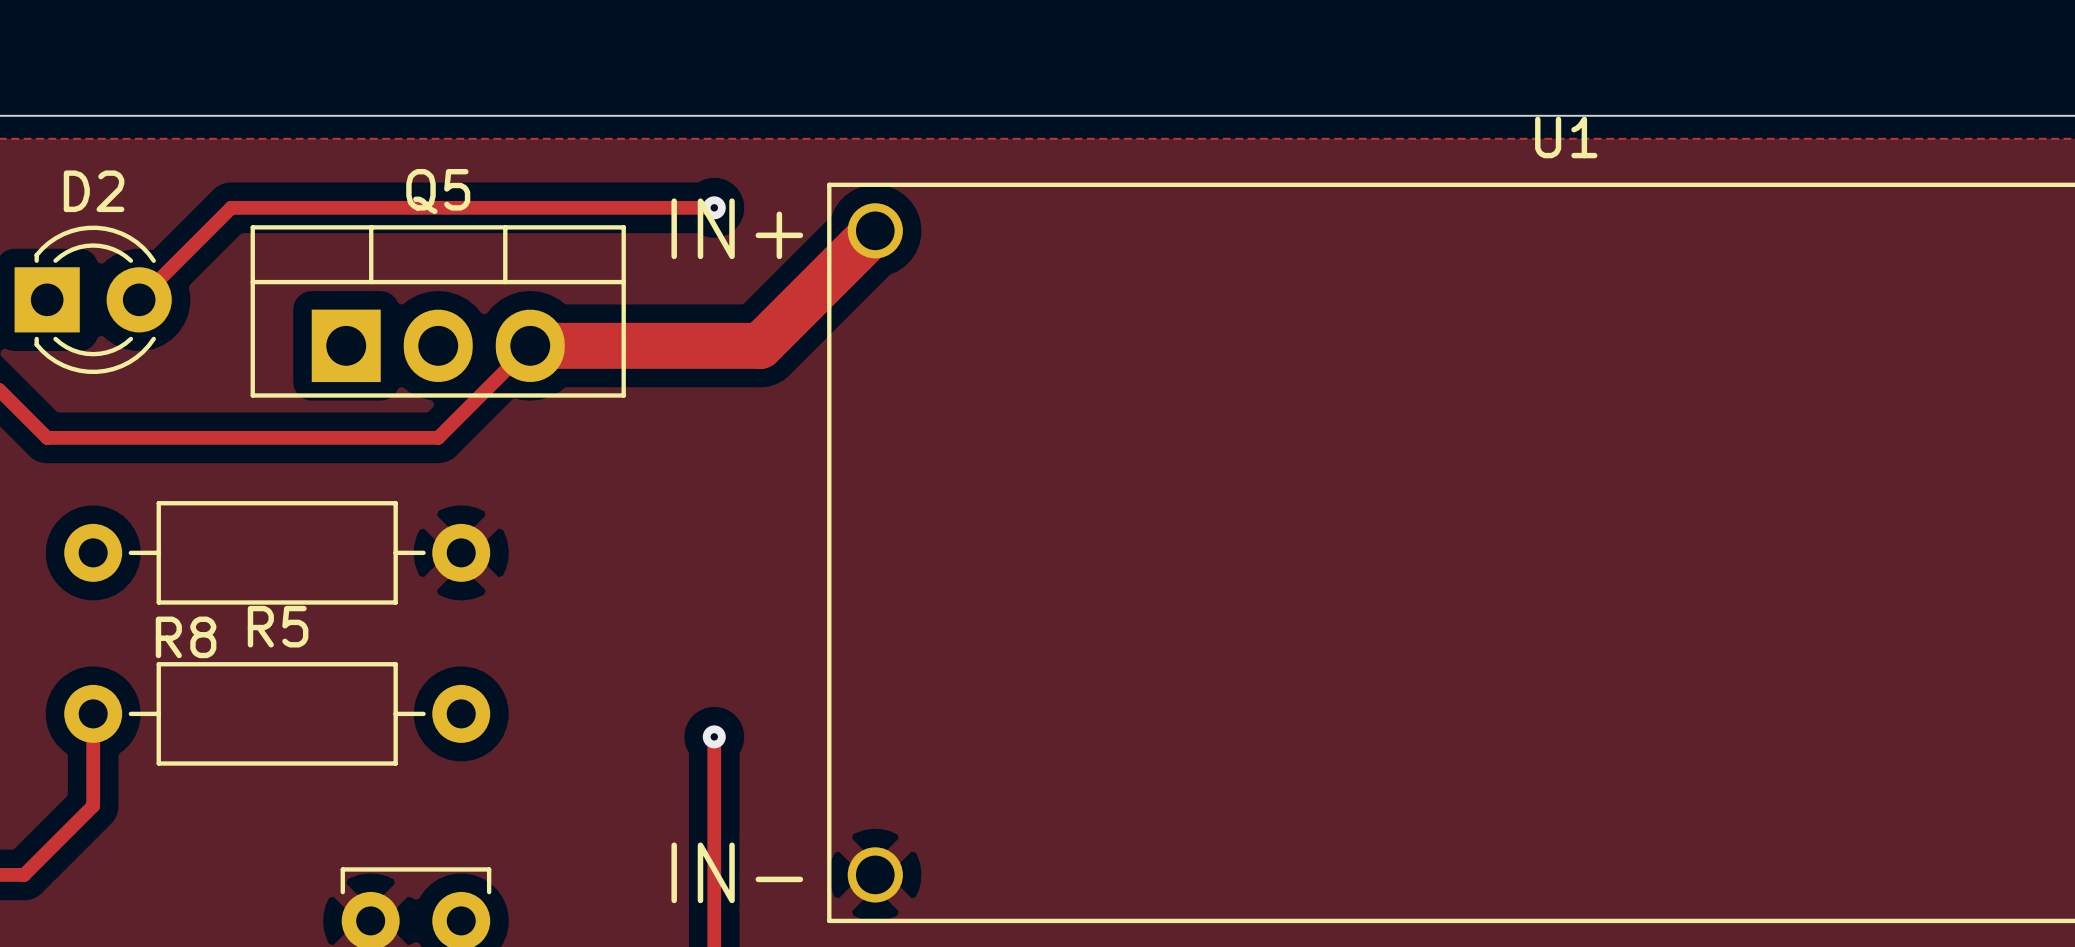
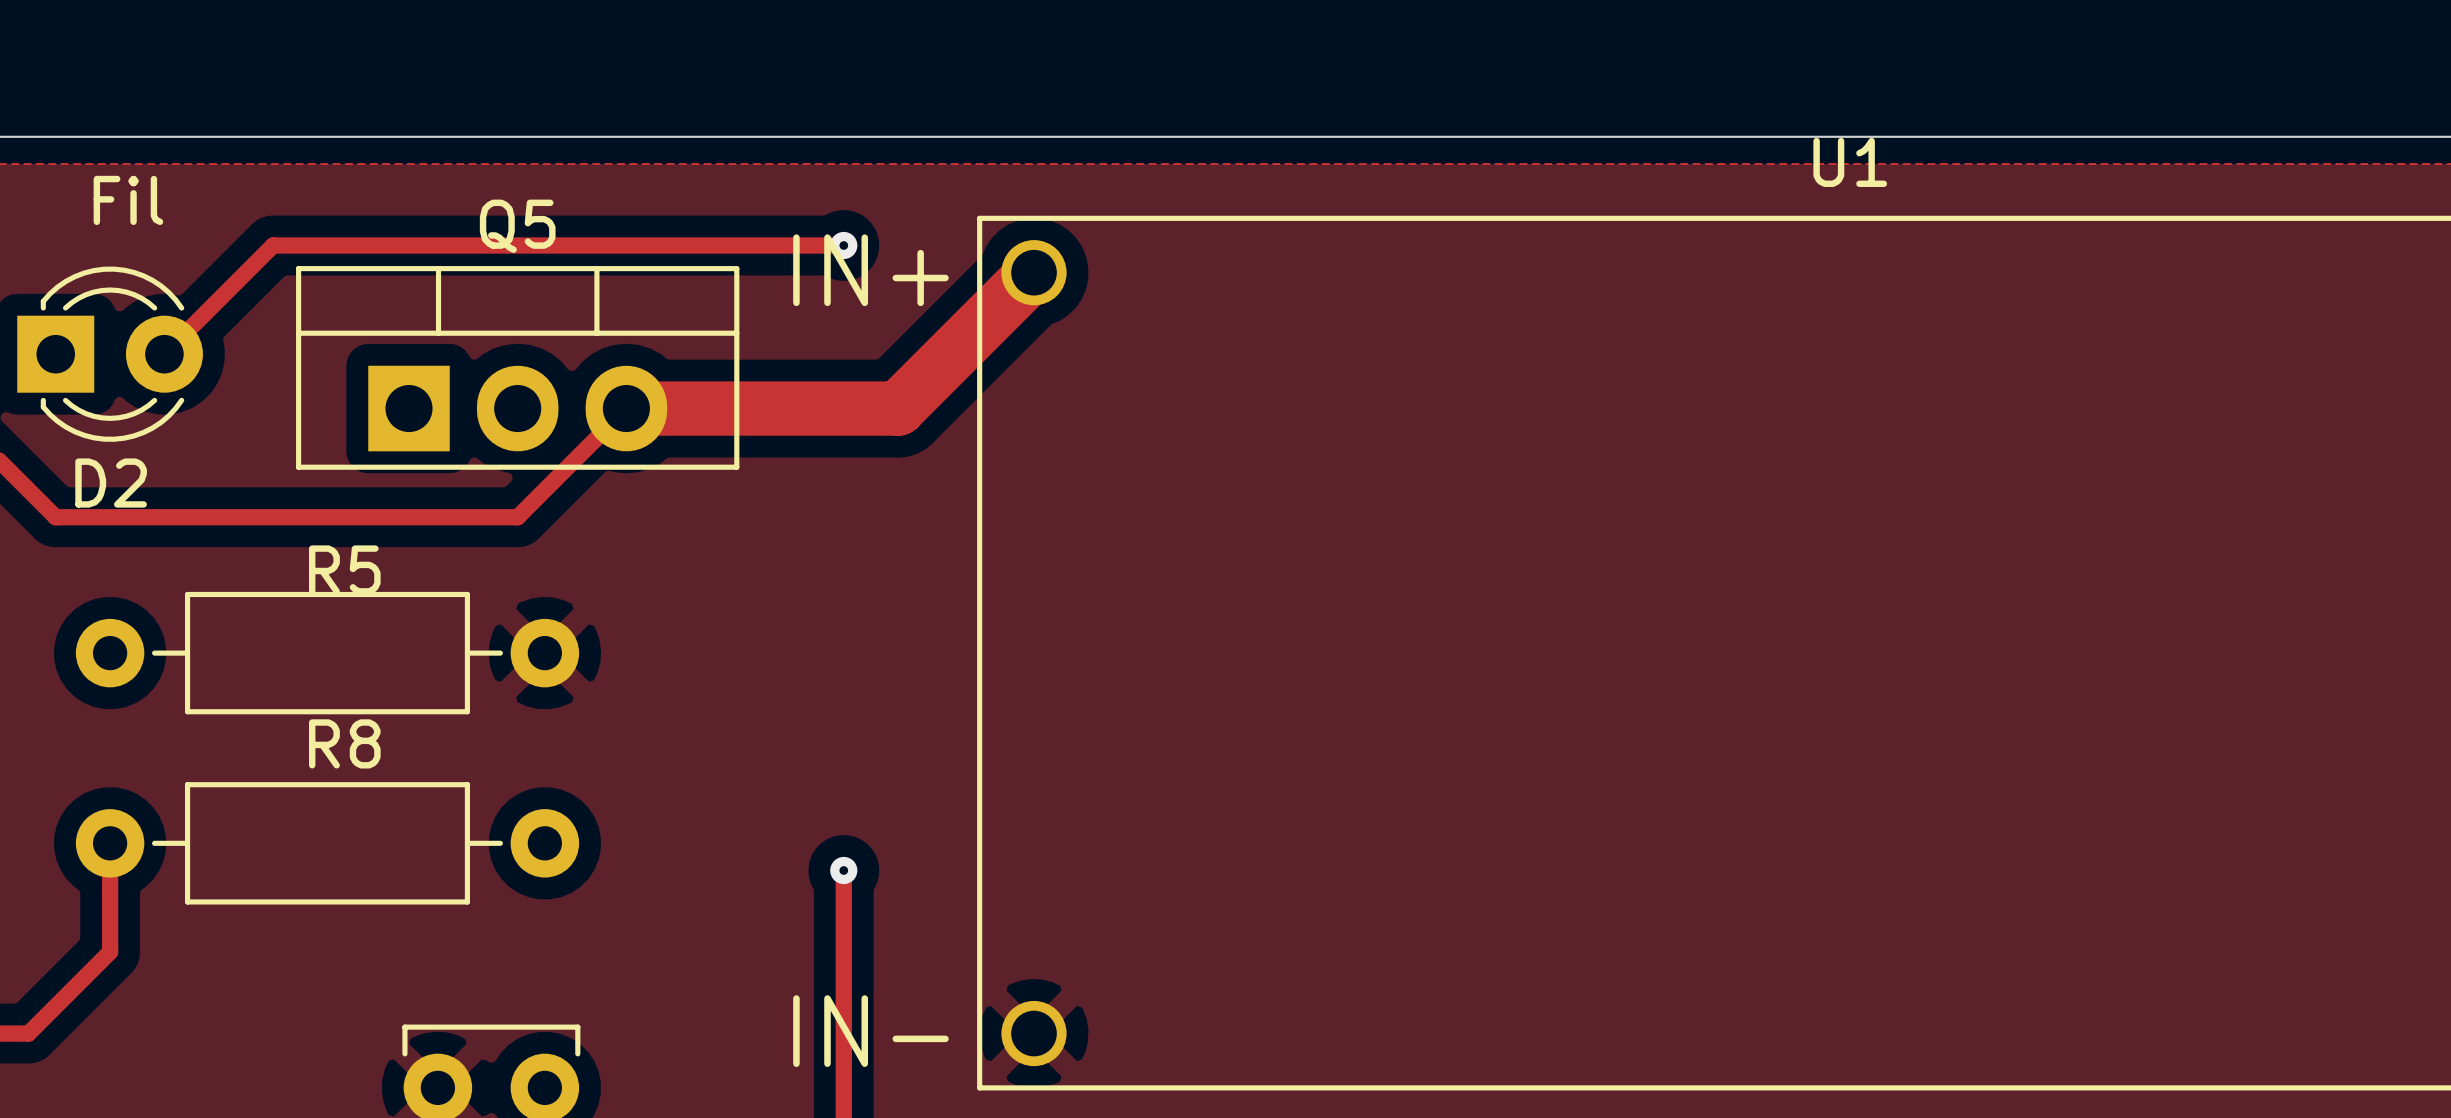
text: none -> Fil (128, 200)
D2 name position: D2 (94, 191) -> D2 (111, 483)
R5 name position: R5 (278, 626) -> R5 (344, 569)
R8 name position: R8 (186, 637) -> R8 (344, 743)

